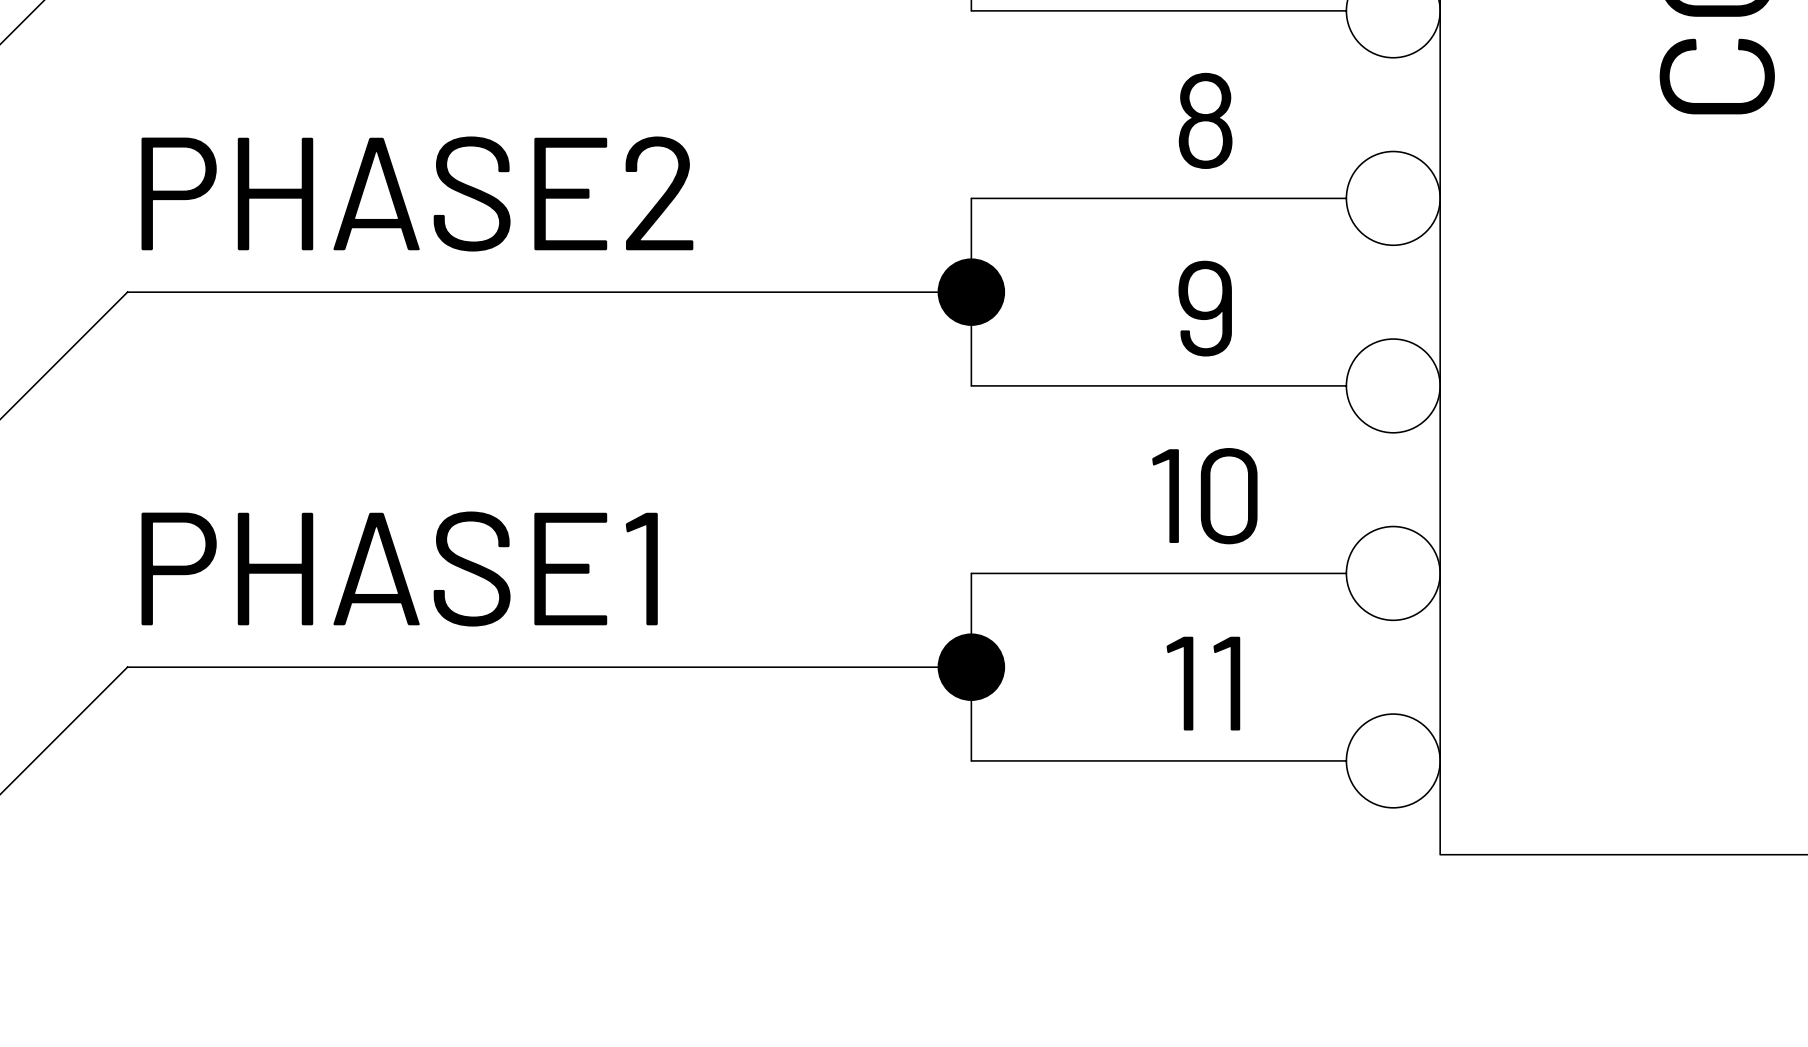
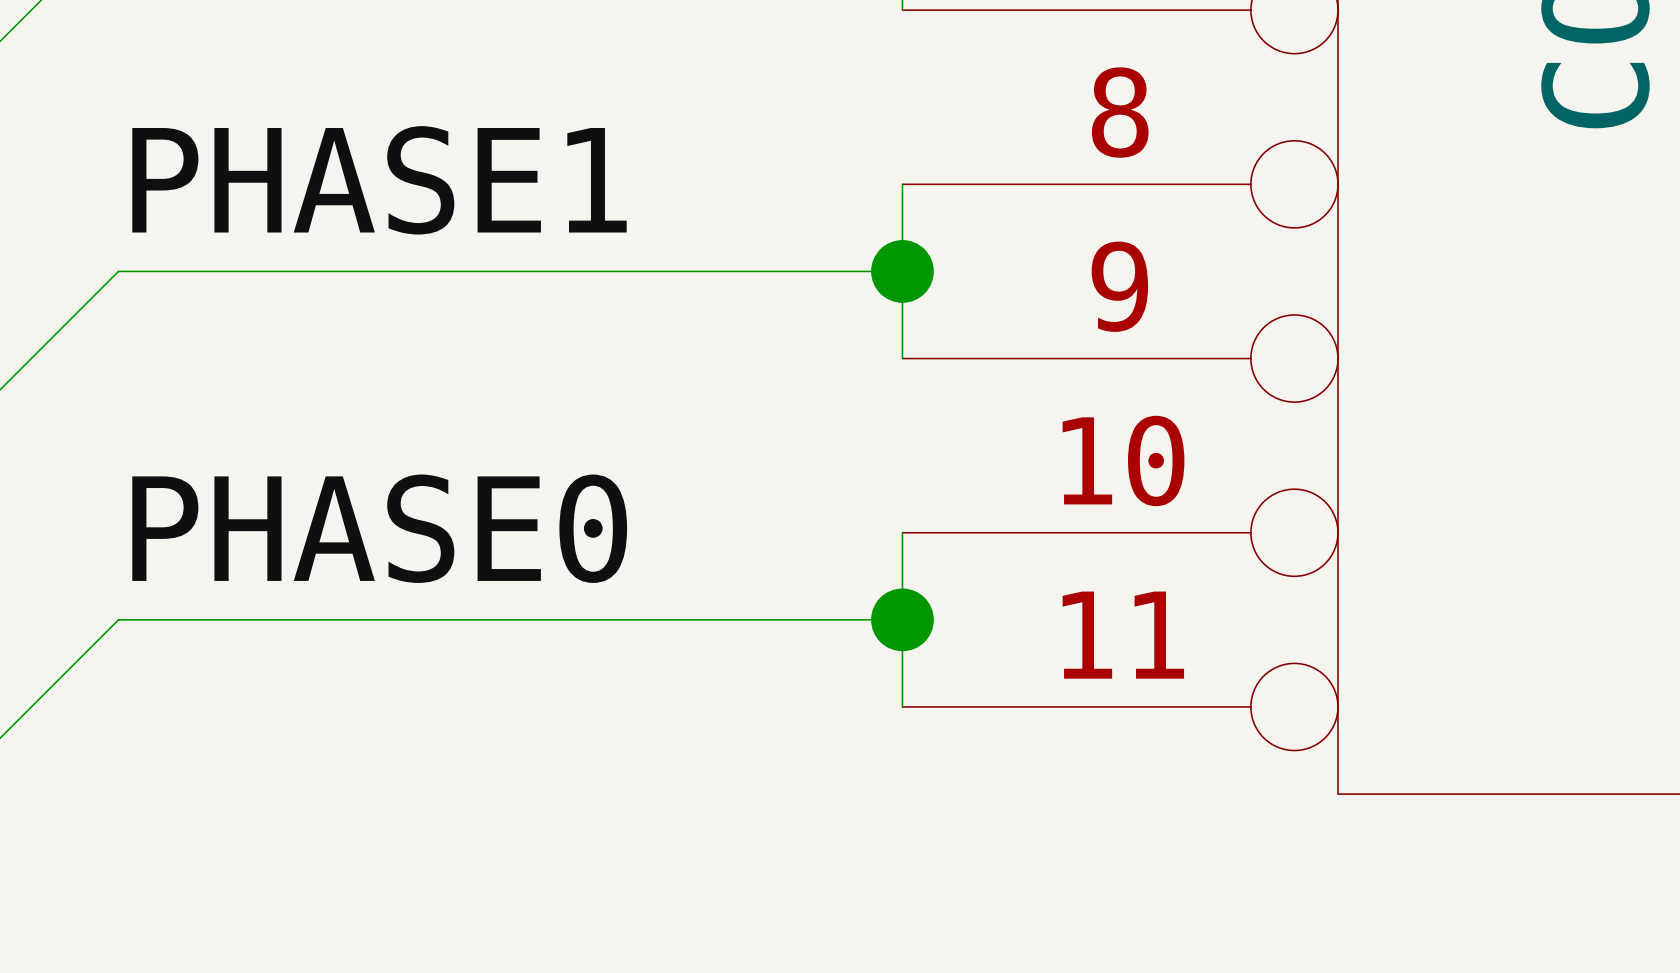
label: PHASE2 (417, 194) -> PHASE1 (379, 180)
label: PHASE1 (399, 569) -> PHASE0 (379, 528)

